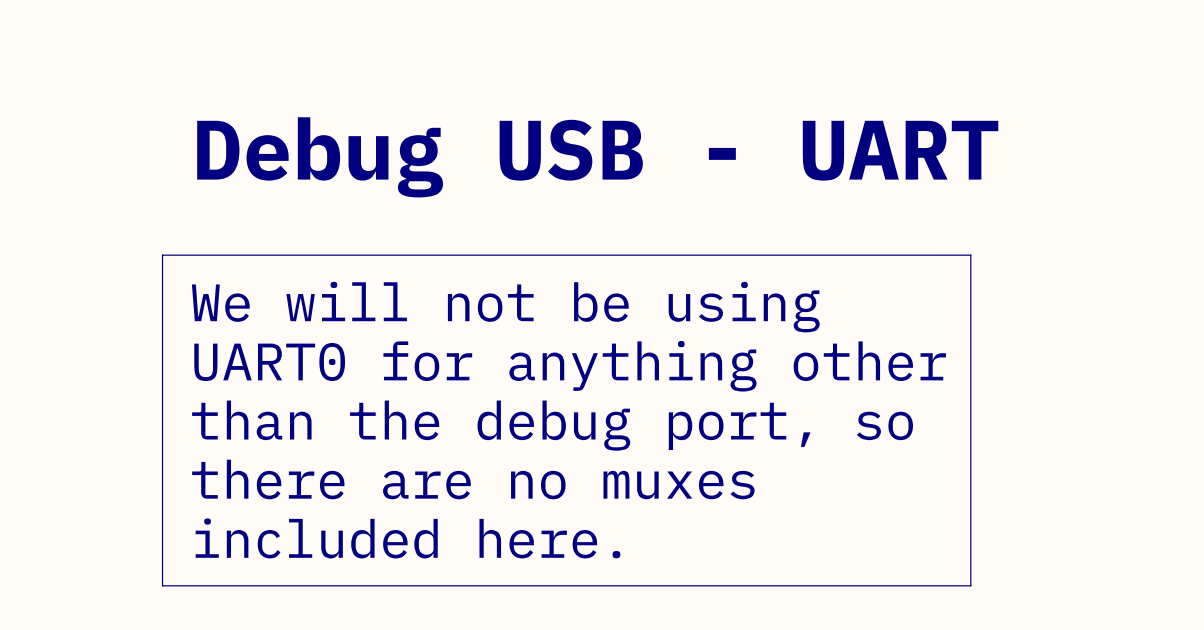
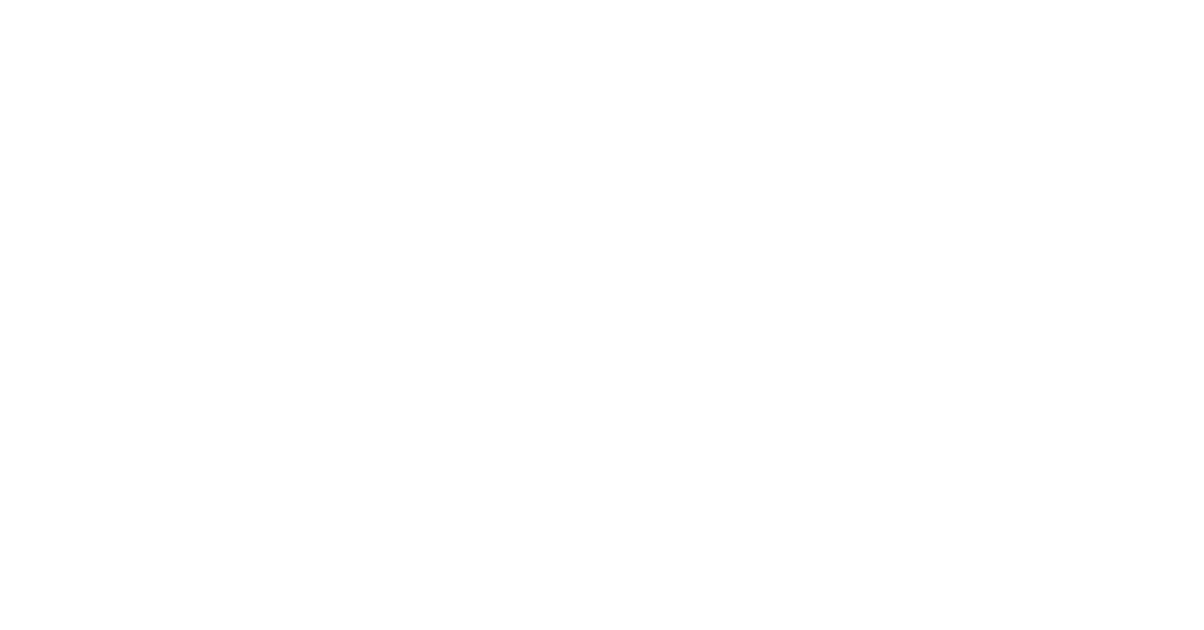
text: Debug USB - UART (597, 157) -> none
line: (162, 255) (970, 255) (970, 585) (162, 585) (162, 255) -> none
text: We will not be using (505, 307) -> none
text: UART0 for anything other (570, 366) -> none
text: than the debug port, so (552, 425) -> none
text: there are no muxes (473, 479) -> none
text: included here. (408, 538) -> none

